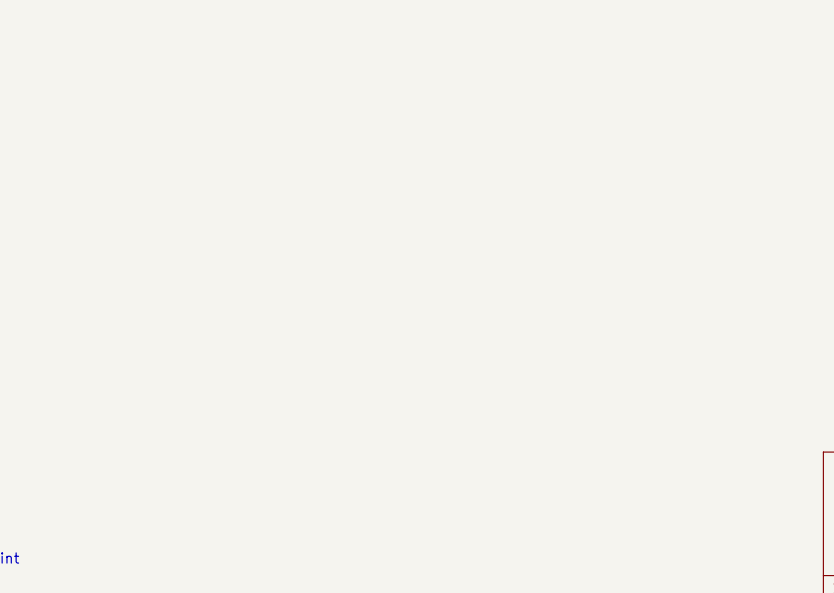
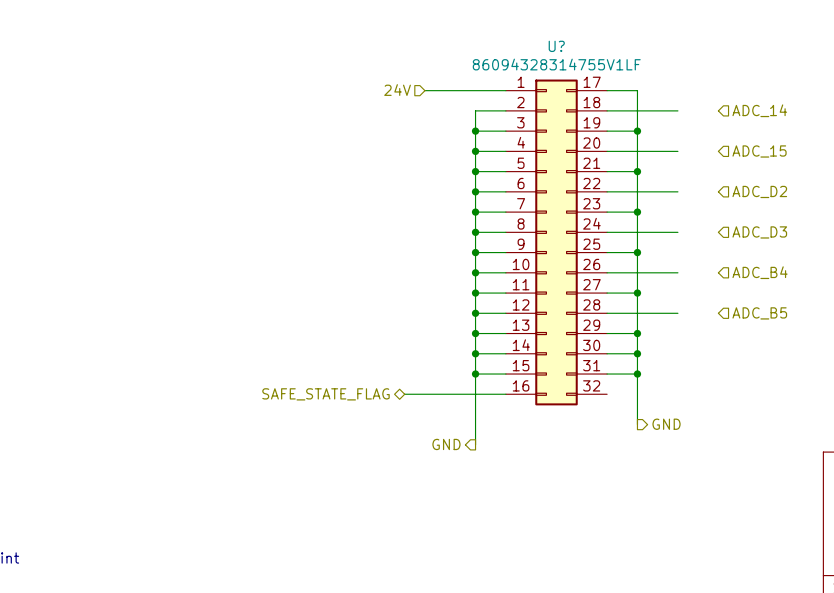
hierarchical label: none -> 24V (397, 90)
wire: none -> (424, 90) (505, 90)
wire: none -> (607, 90) (637, 90) (637, 424)
wire: none -> (505, 110) (475, 110) (475, 444)
wire: none -> (607, 110) (677, 110)
hierarchical label: none -> ADC_14 (759, 110)
wire: none -> (475, 131) (505, 131)
junction: none -> (475, 131)
wire: none -> (607, 131) (637, 131)
junction: none -> (637, 131)
wire: none -> (475, 151) (505, 151)
junction: none -> (475, 151)
wire: none -> (607, 151) (677, 151)
hierarchical label: none -> ADC_15 (759, 151)
wire: none -> (475, 171) (505, 171)
junction: none -> (475, 171)
wire: none -> (607, 171) (637, 171)
junction: none -> (637, 171)
wire: none -> (475, 191) (505, 191)
junction: none -> (475, 191)
wire: none -> (607, 191) (677, 191)
hierarchical label: none -> ADC_D2 (759, 191)
wire: none -> (475, 212) (505, 212)
junction: none -> (475, 212)
wire: none -> (607, 212) (637, 212)
junction: none -> (637, 212)
wire: none -> (475, 232) (505, 232)
junction: none -> (475, 232)
wire: none -> (607, 232) (677, 232)
hierarchical label: none -> ADC_D3 (759, 232)
U?: none -> 86094328314755V1LF (556, 242)
wire: none -> (475, 252) (505, 252)
junction: none -> (475, 252)
wire: none -> (607, 252) (637, 252)
junction: none -> (637, 252)
wire: none -> (475, 272) (505, 272)
junction: none -> (475, 272)
wire: none -> (607, 272) (677, 272)
hierarchical label: none -> ADC_B4 (760, 272)
wire: none -> (475, 293) (505, 293)
junction: none -> (475, 293)
wire: none -> (607, 293) (637, 293)
junction: none -> (637, 293)
wire: none -> (475, 313) (505, 313)
junction: none -> (475, 313)
wire: none -> (607, 313) (677, 313)
hierarchical label: none -> ADC_B5 (759, 313)
wire: none -> (475, 333) (505, 333)
junction: none -> (475, 333)
wire: none -> (607, 333) (637, 333)
junction: none -> (637, 333)
wire: none -> (475, 353) (505, 353)
junction: none -> (475, 353)
wire: none -> (607, 353) (637, 353)
junction: none -> (637, 353)
wire: none -> (475, 374) (505, 374)
junction: none -> (475, 374)
wire: none -> (607, 374) (637, 374)
junction: none -> (637, 374)
hierarchical label: none -> SAFE_STATE_FLAG (325, 394)
wire: none -> (404, 394) (505, 394)
hierarchical label: none -> GND (666, 424)
hierarchical label: none -> GND (446, 444)

